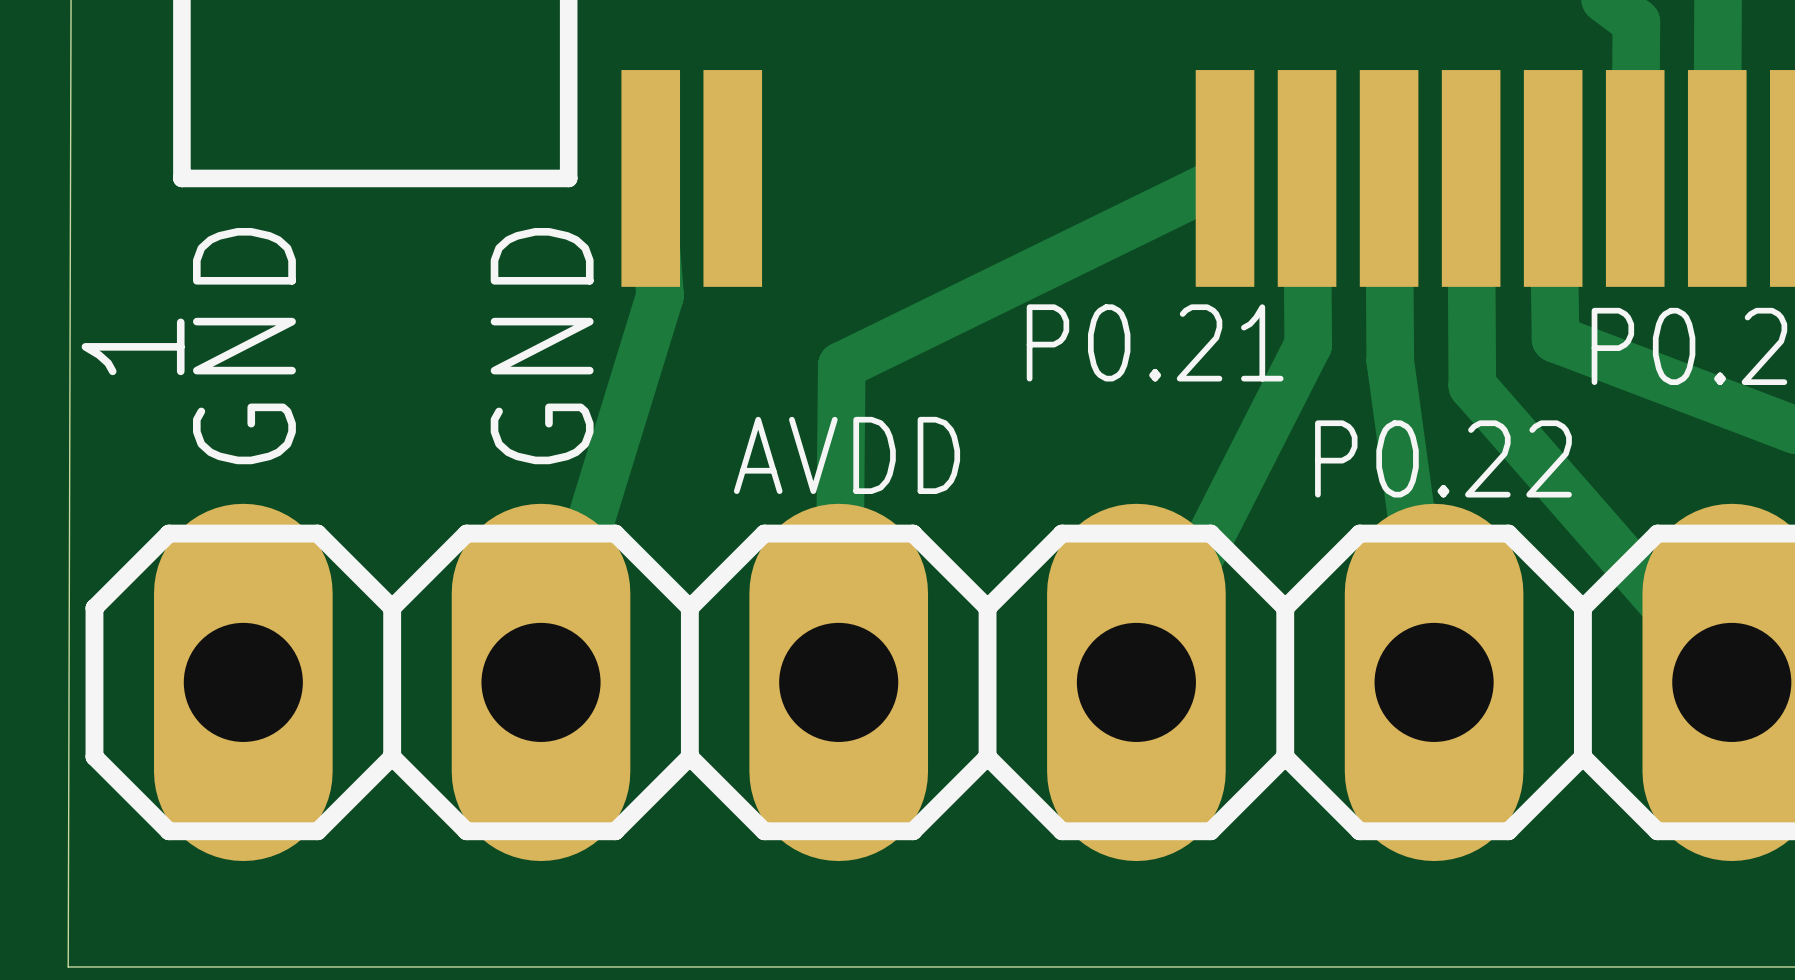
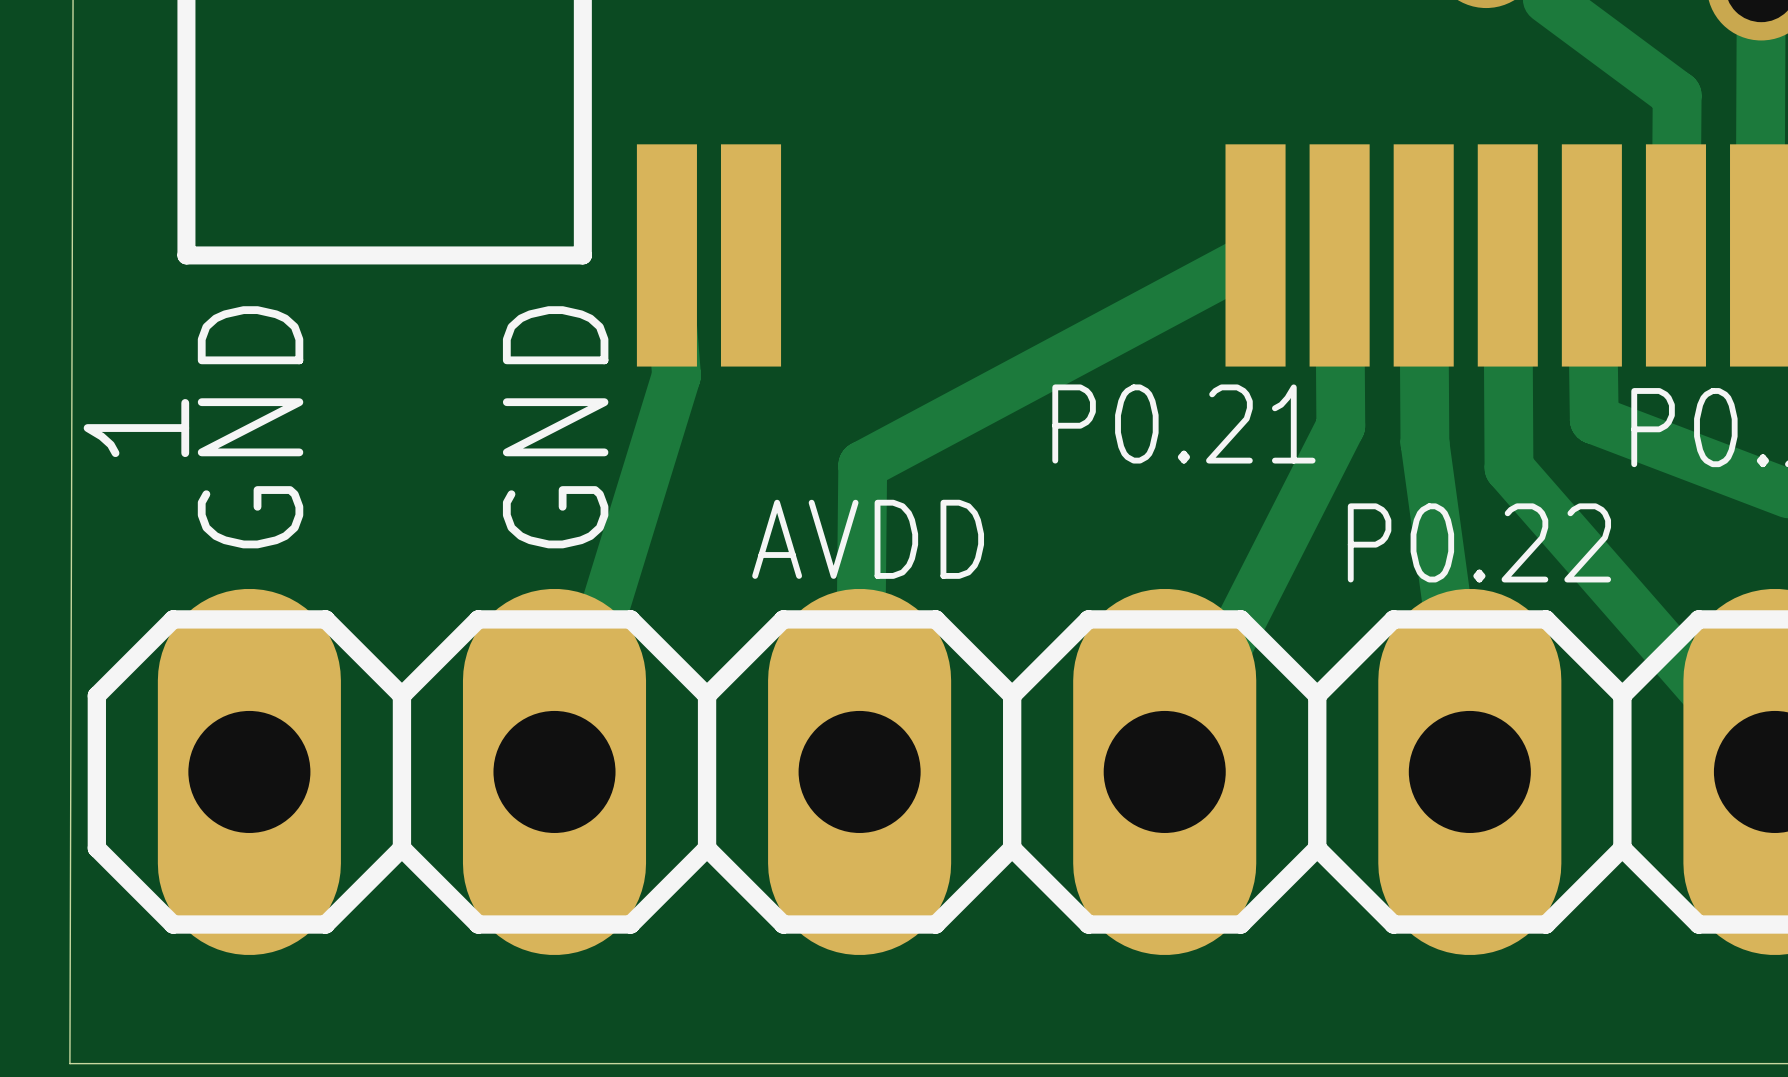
track: (1225, 178) (841, 365) (841, 383) -> (1255, 255) (862, 465)

